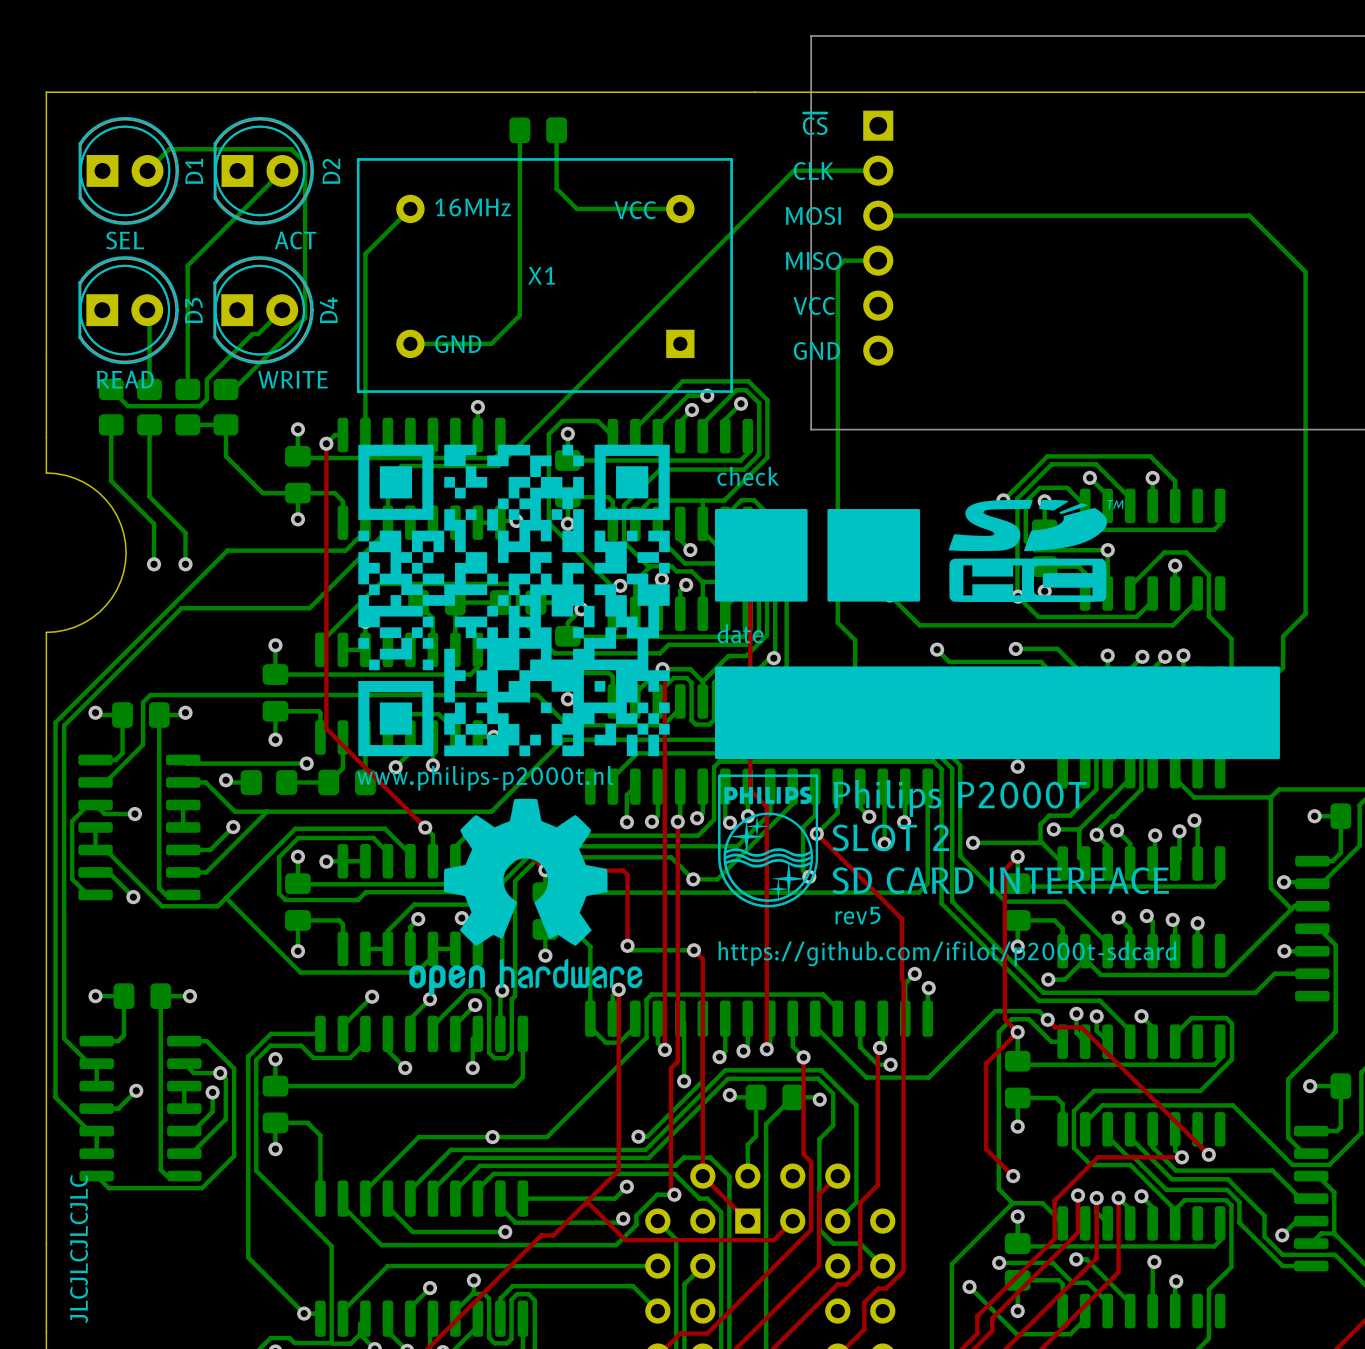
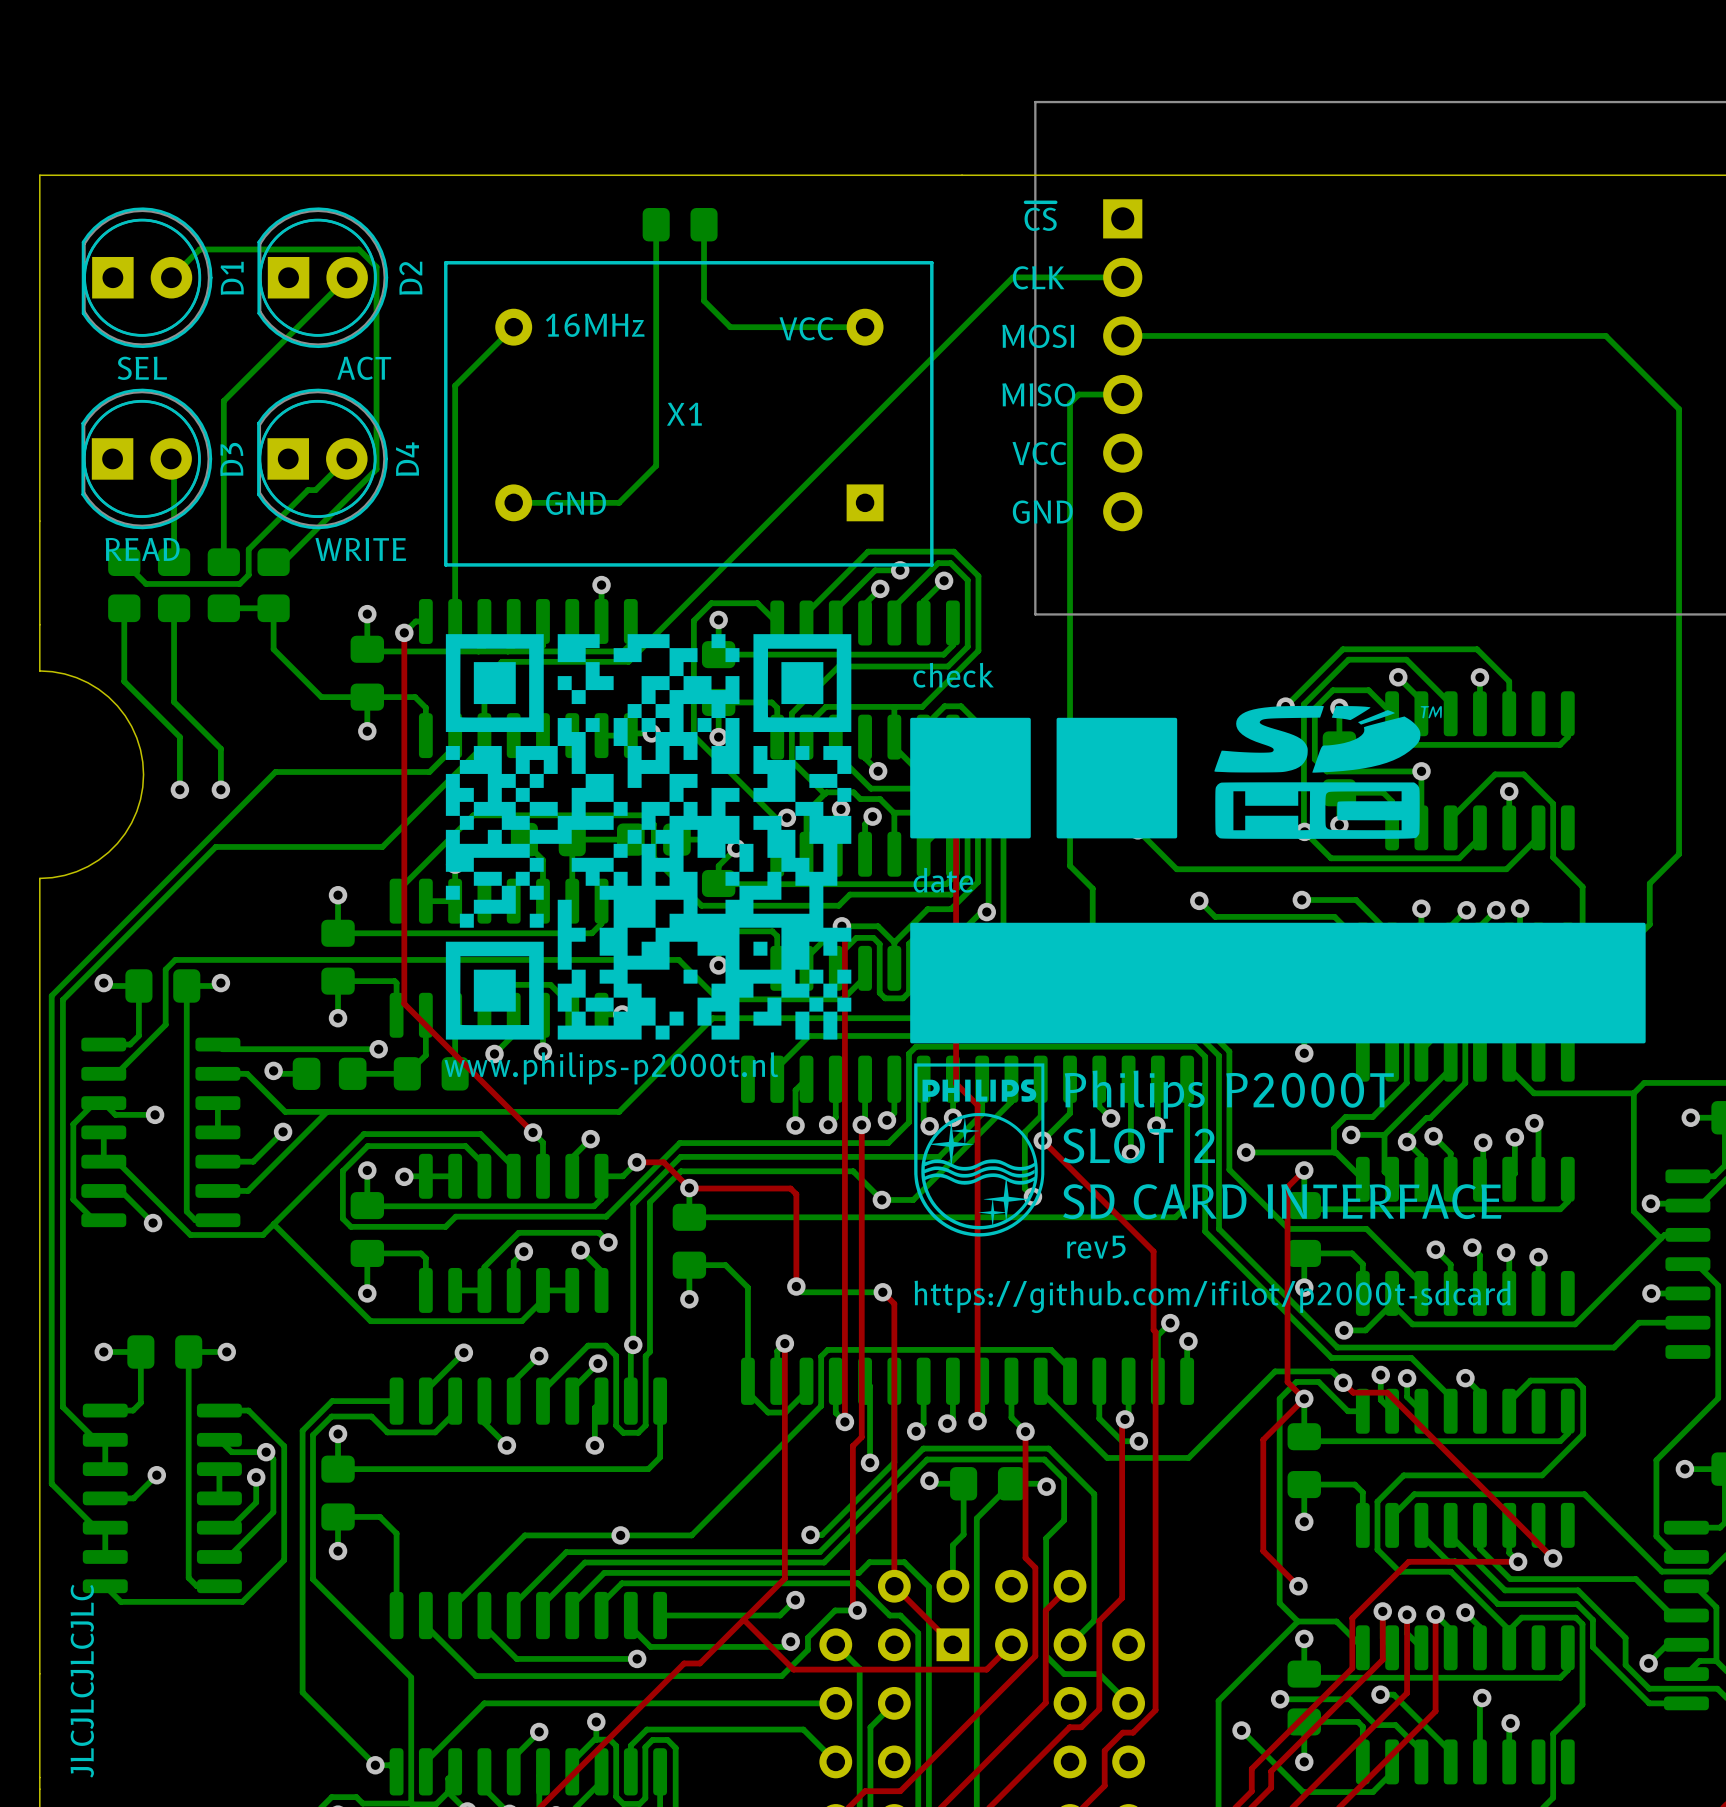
drawing: [409, 798, 643, 996] -> none

